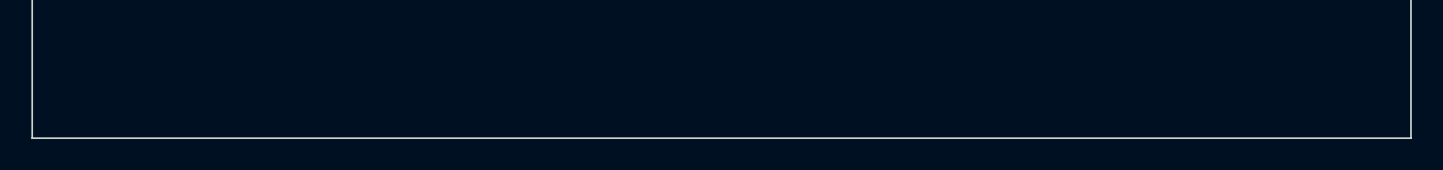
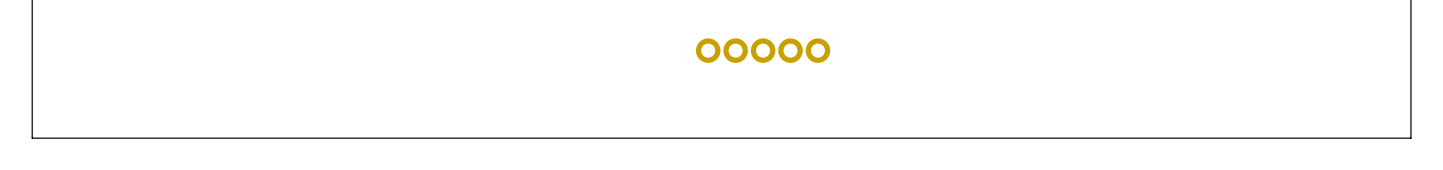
part: none -> (763, 50)

